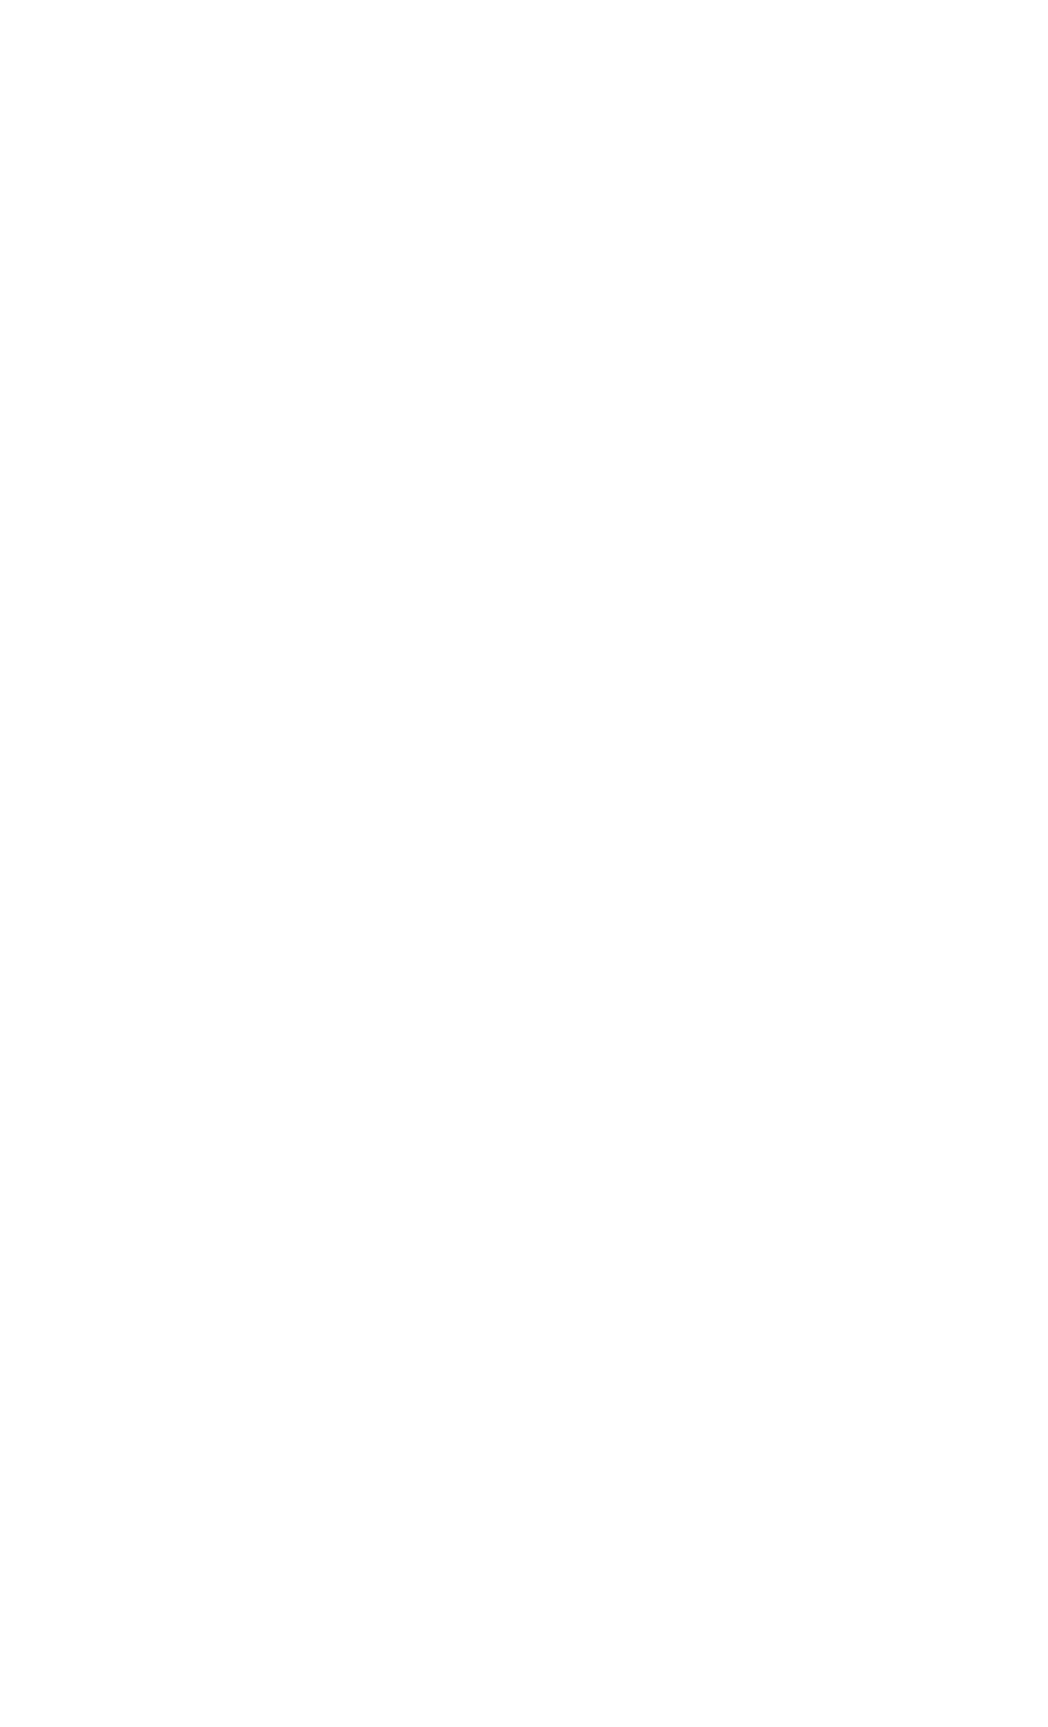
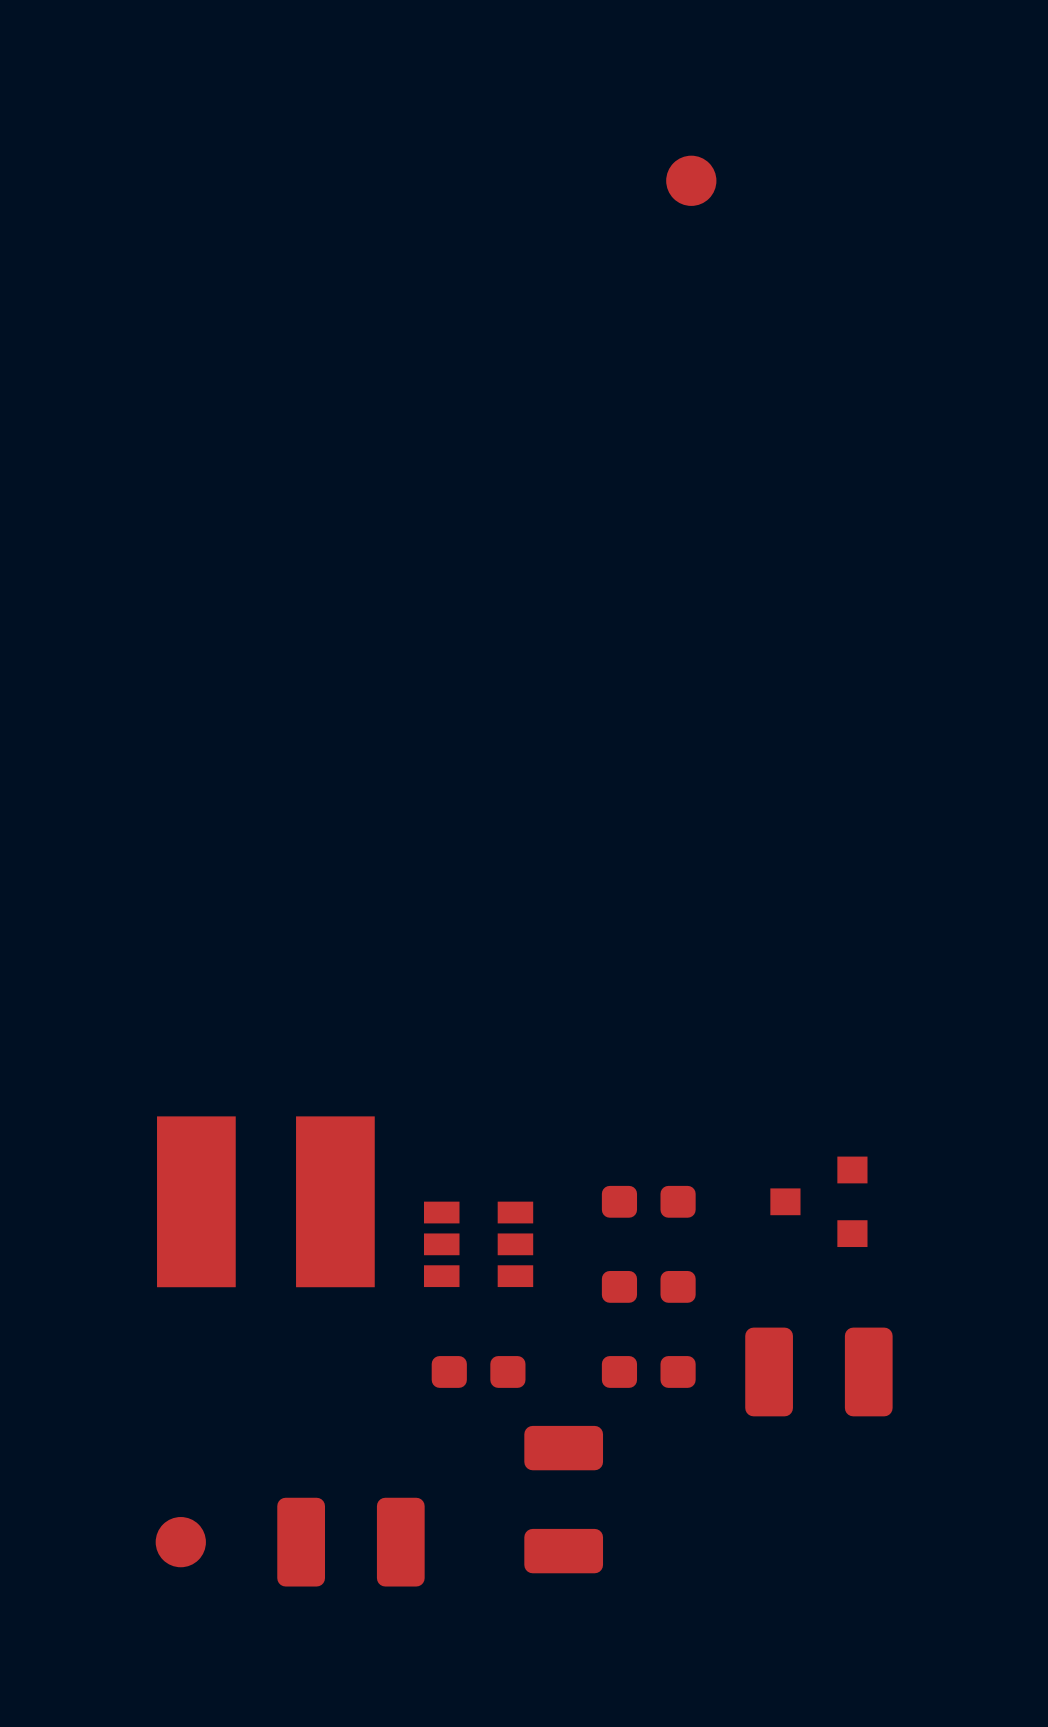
part: none -> (691, 180)
part: none -> (265, 1201)
part: none -> (648, 1201)
part: none -> (818, 1201)
part: none -> (478, 1244)
part: none -> (648, 1286)
part: none -> (478, 1371)
part: none -> (648, 1371)
part: none -> (818, 1371)
part: none -> (563, 1499)
part: none -> (180, 1542)
part: none -> (350, 1542)

